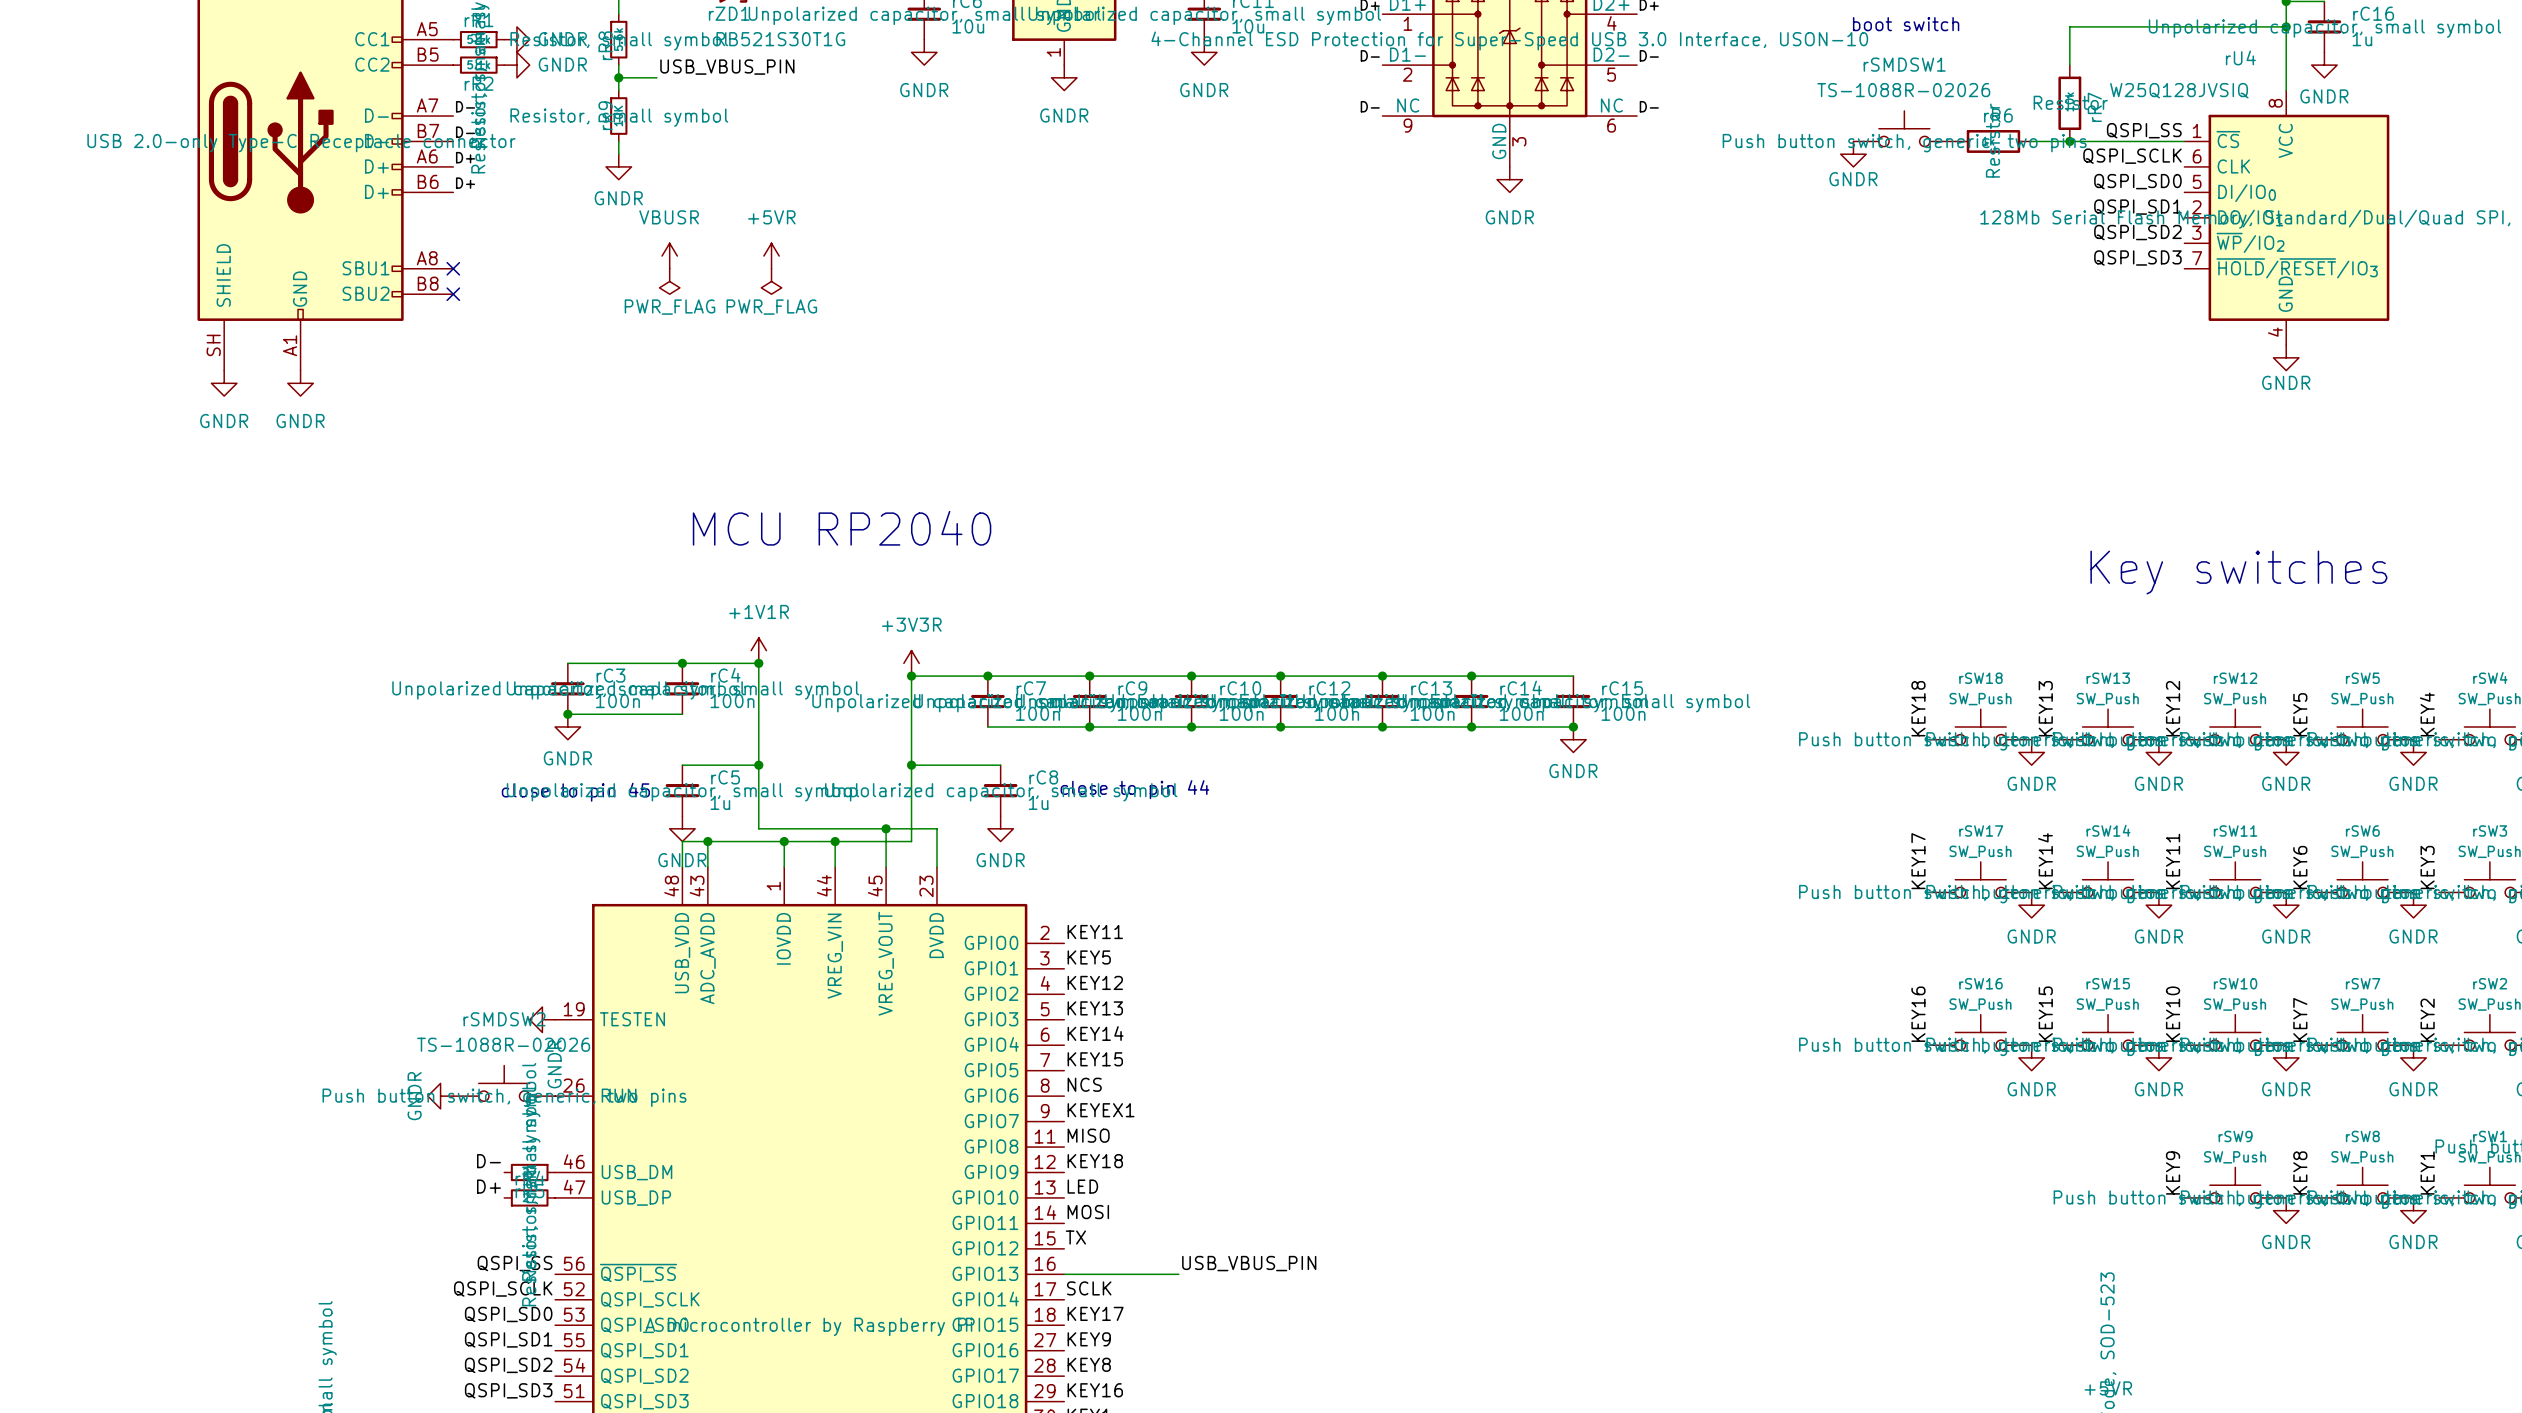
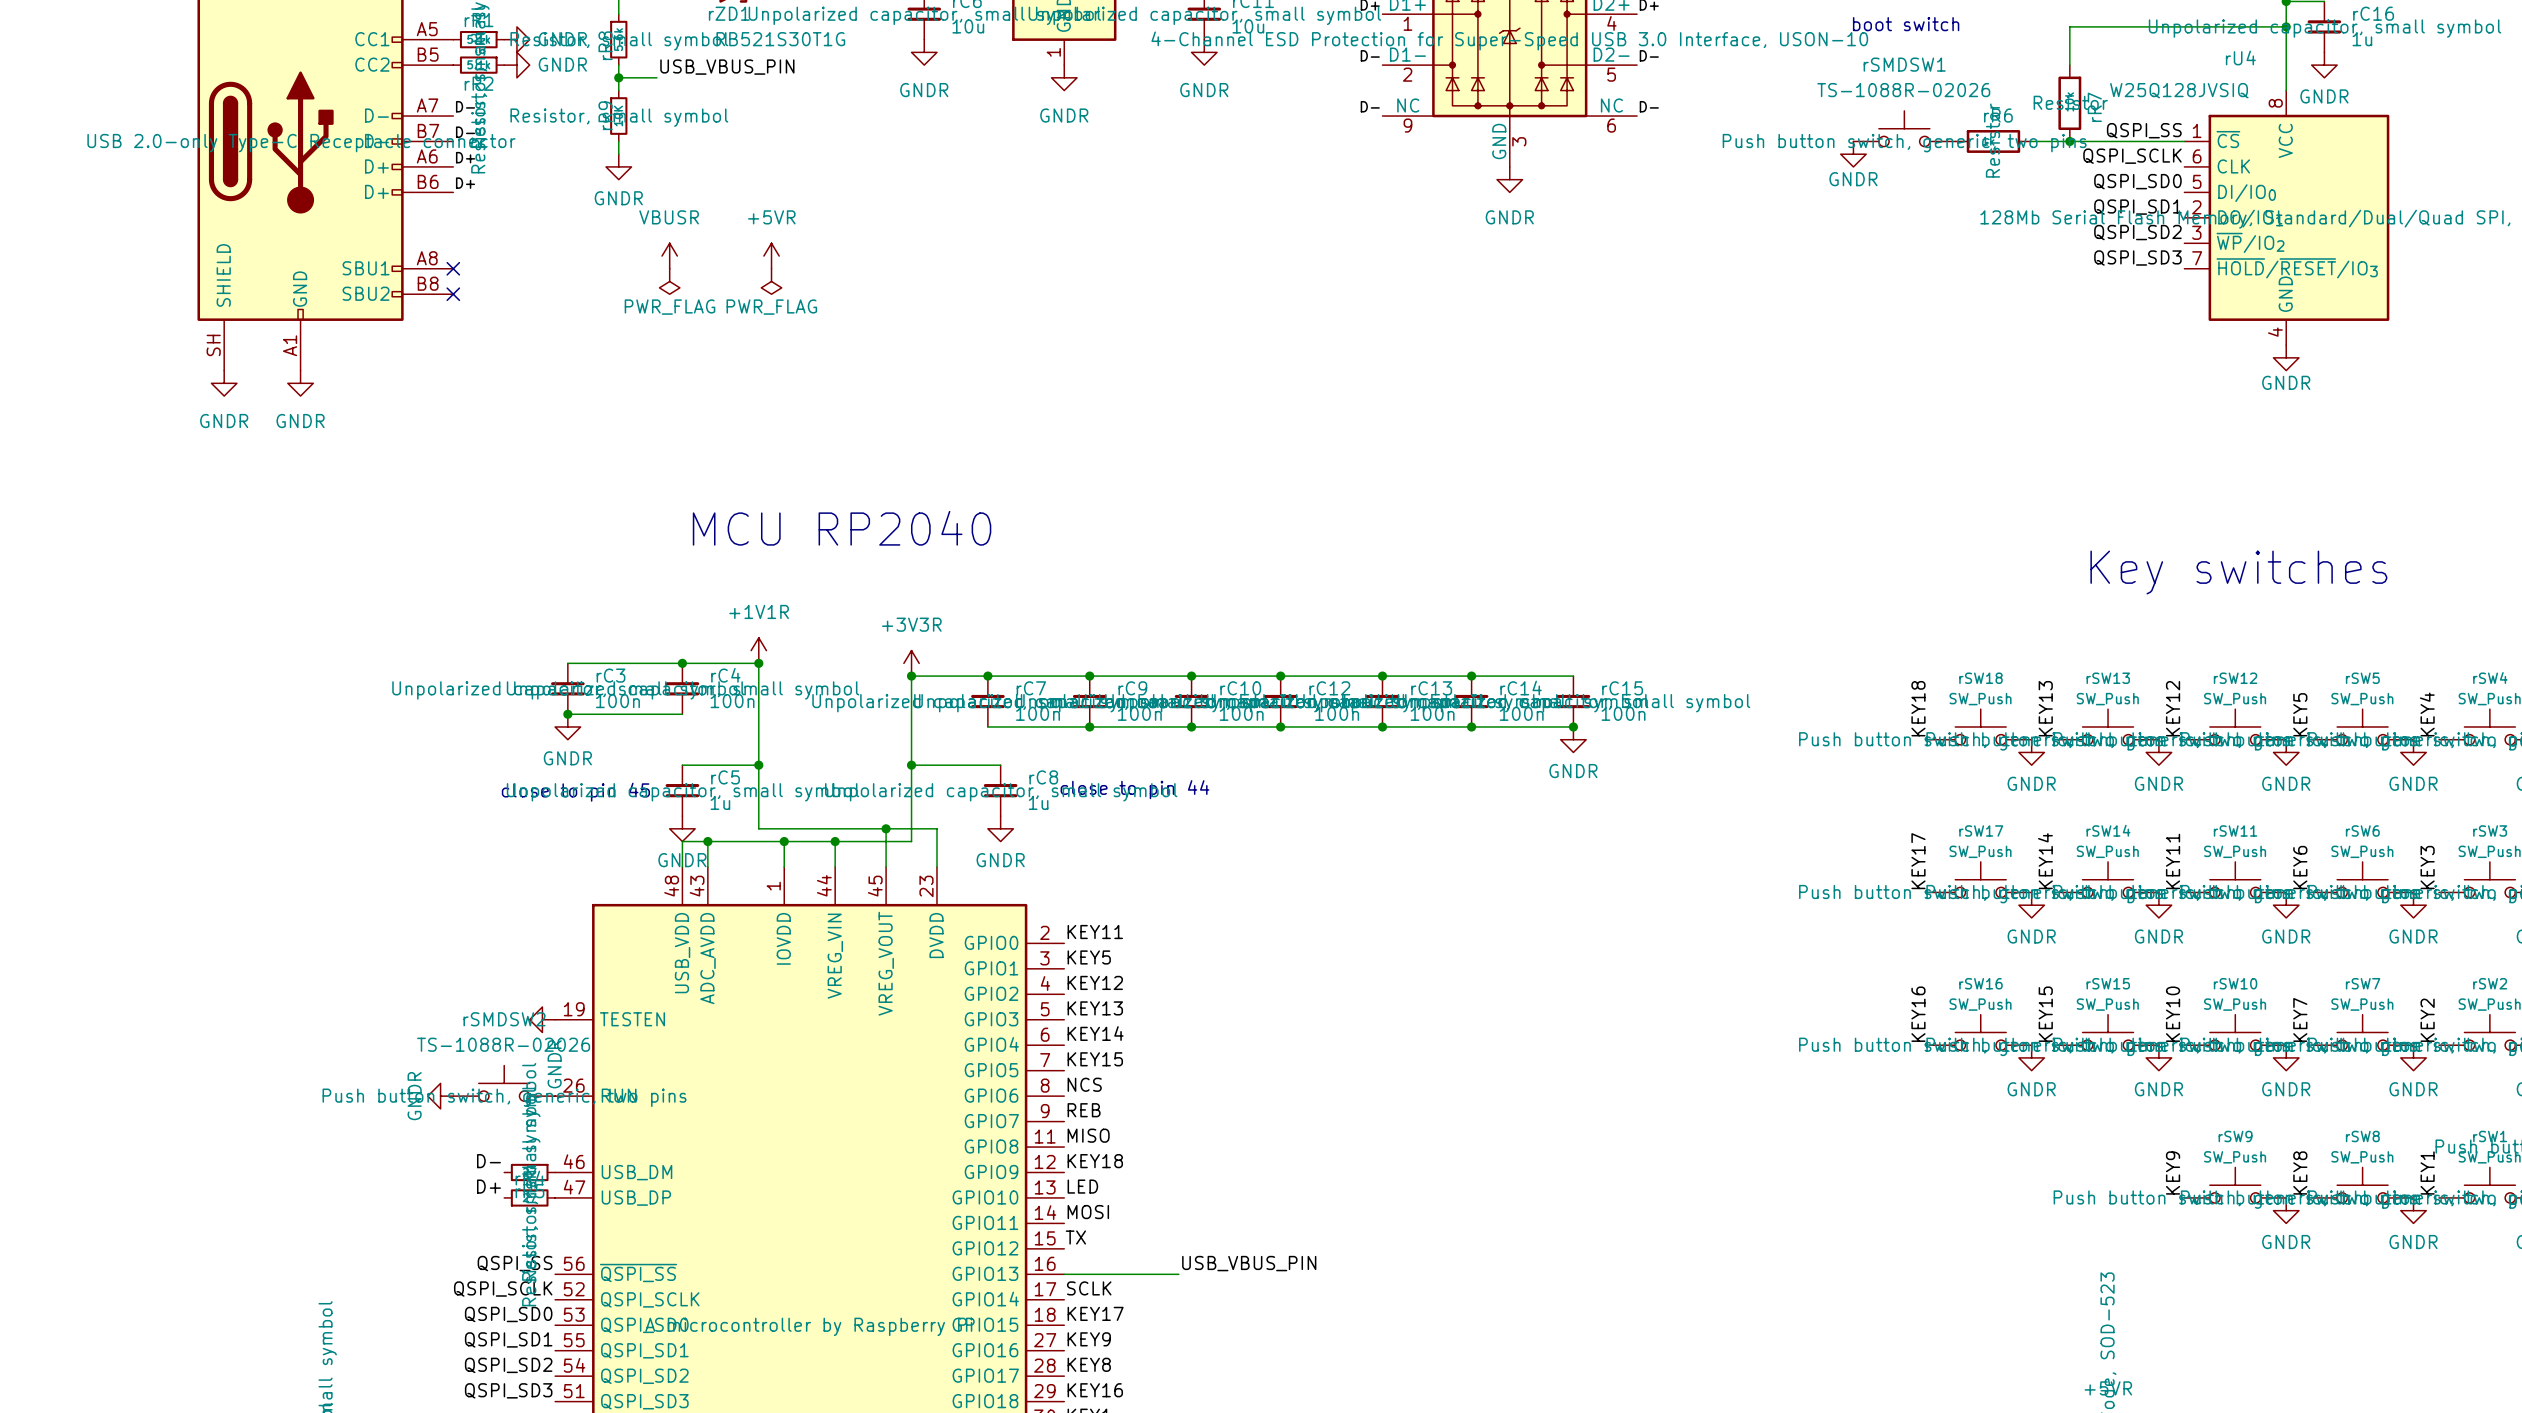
label: KEYEX1 (1101, 1110) -> REB (1084, 1110)

